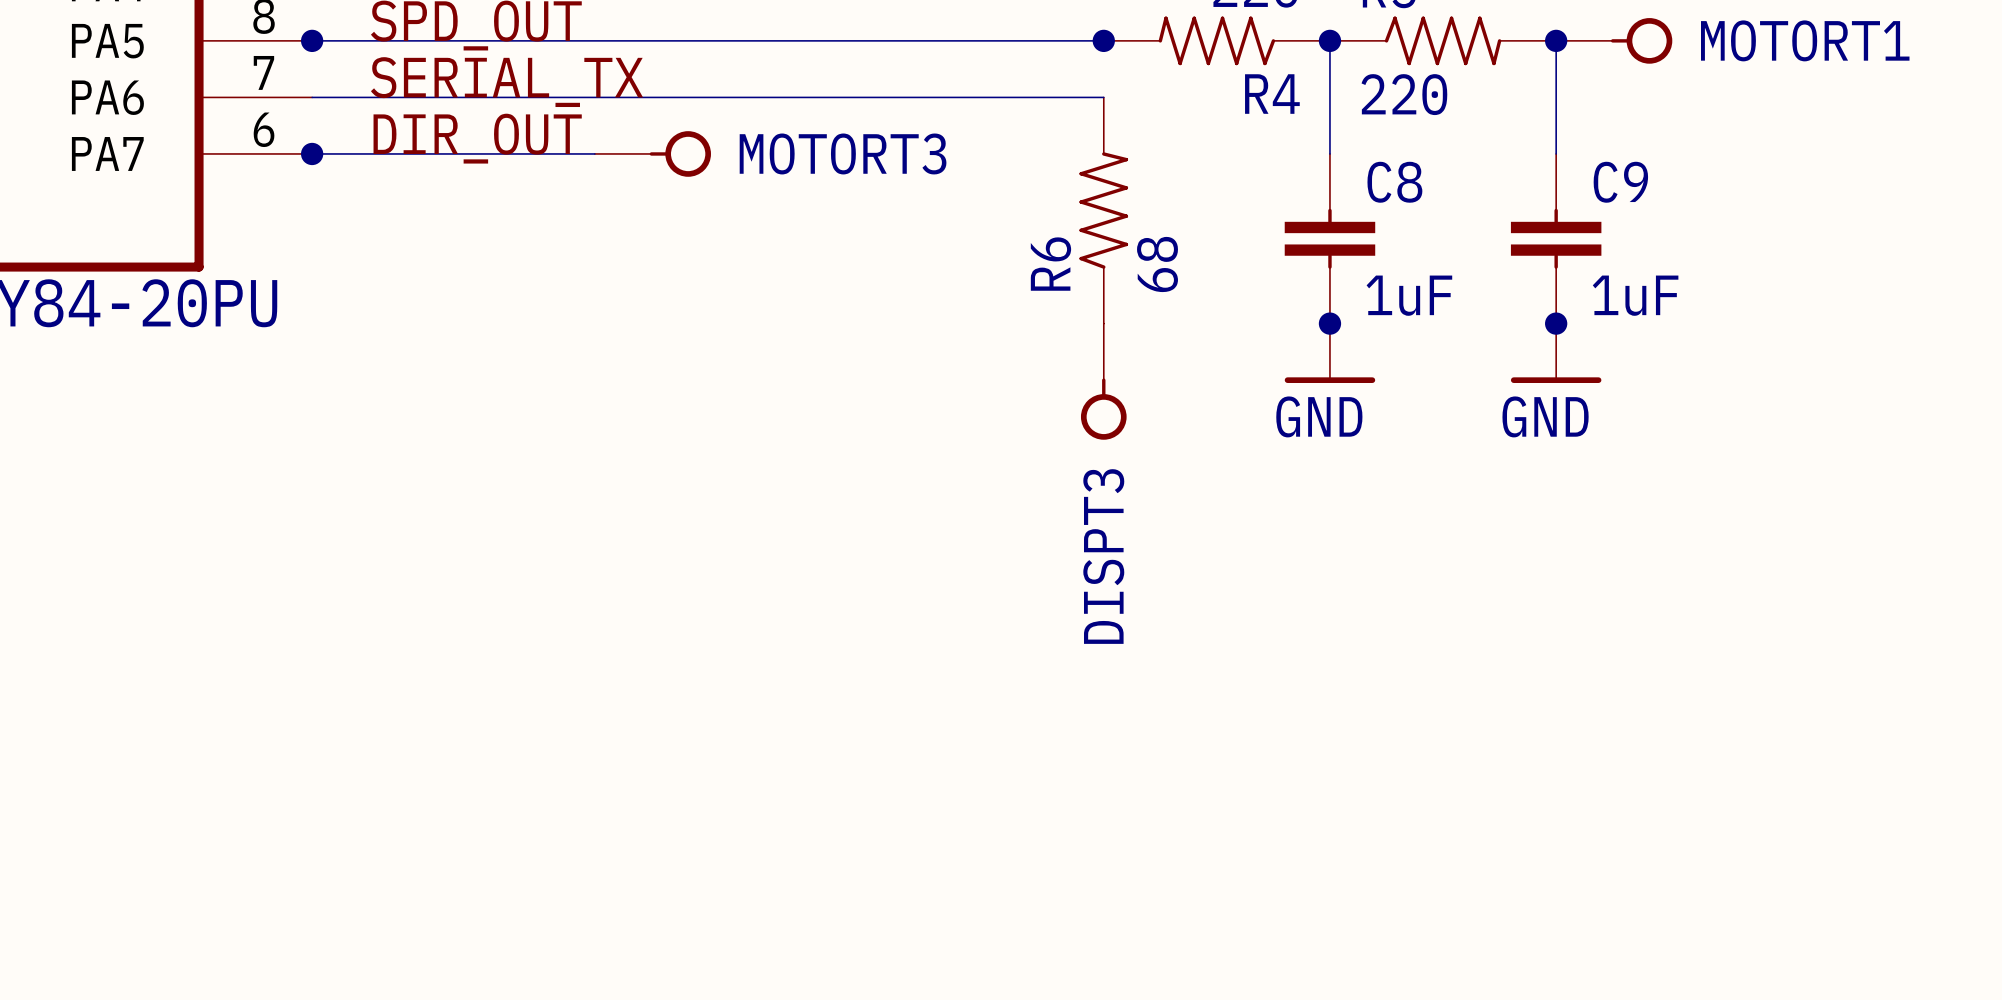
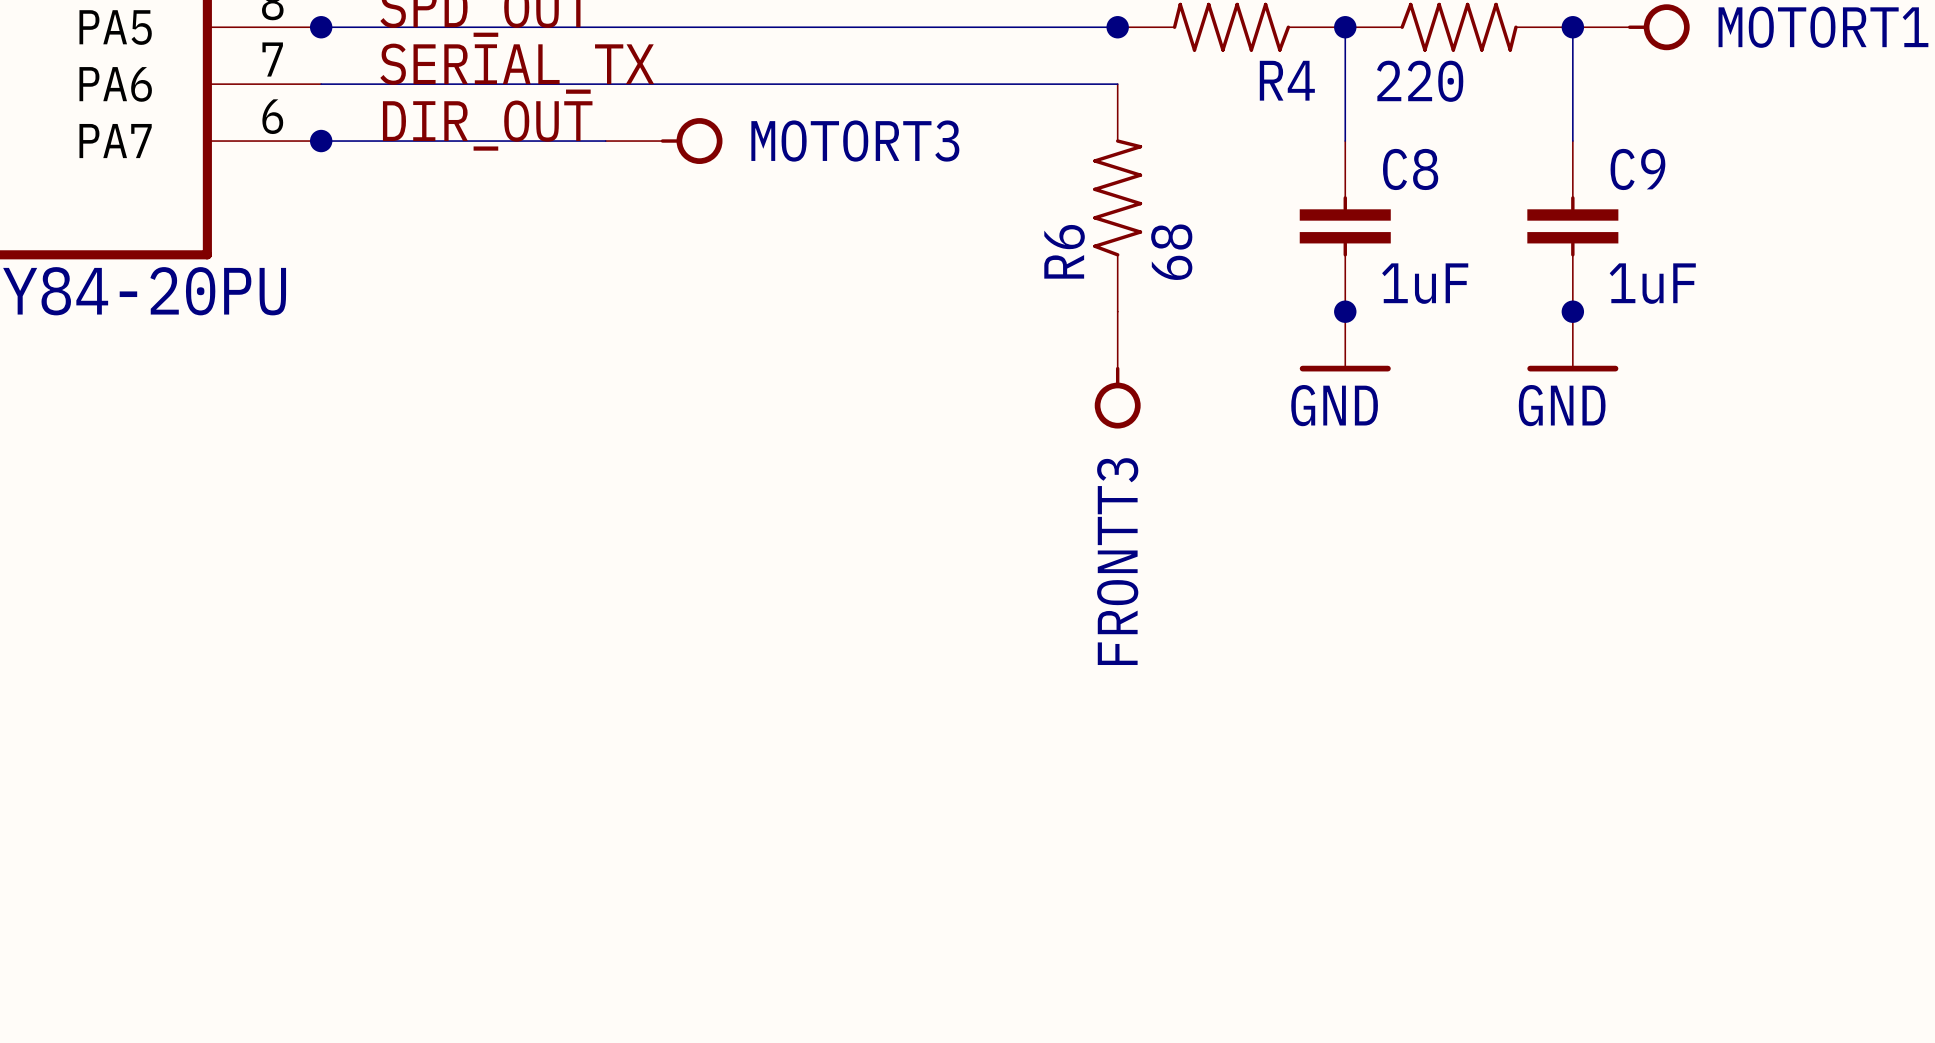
DISPT3 name: DISPT3 (1103, 556) -> FRONTT3 (1117, 561)

